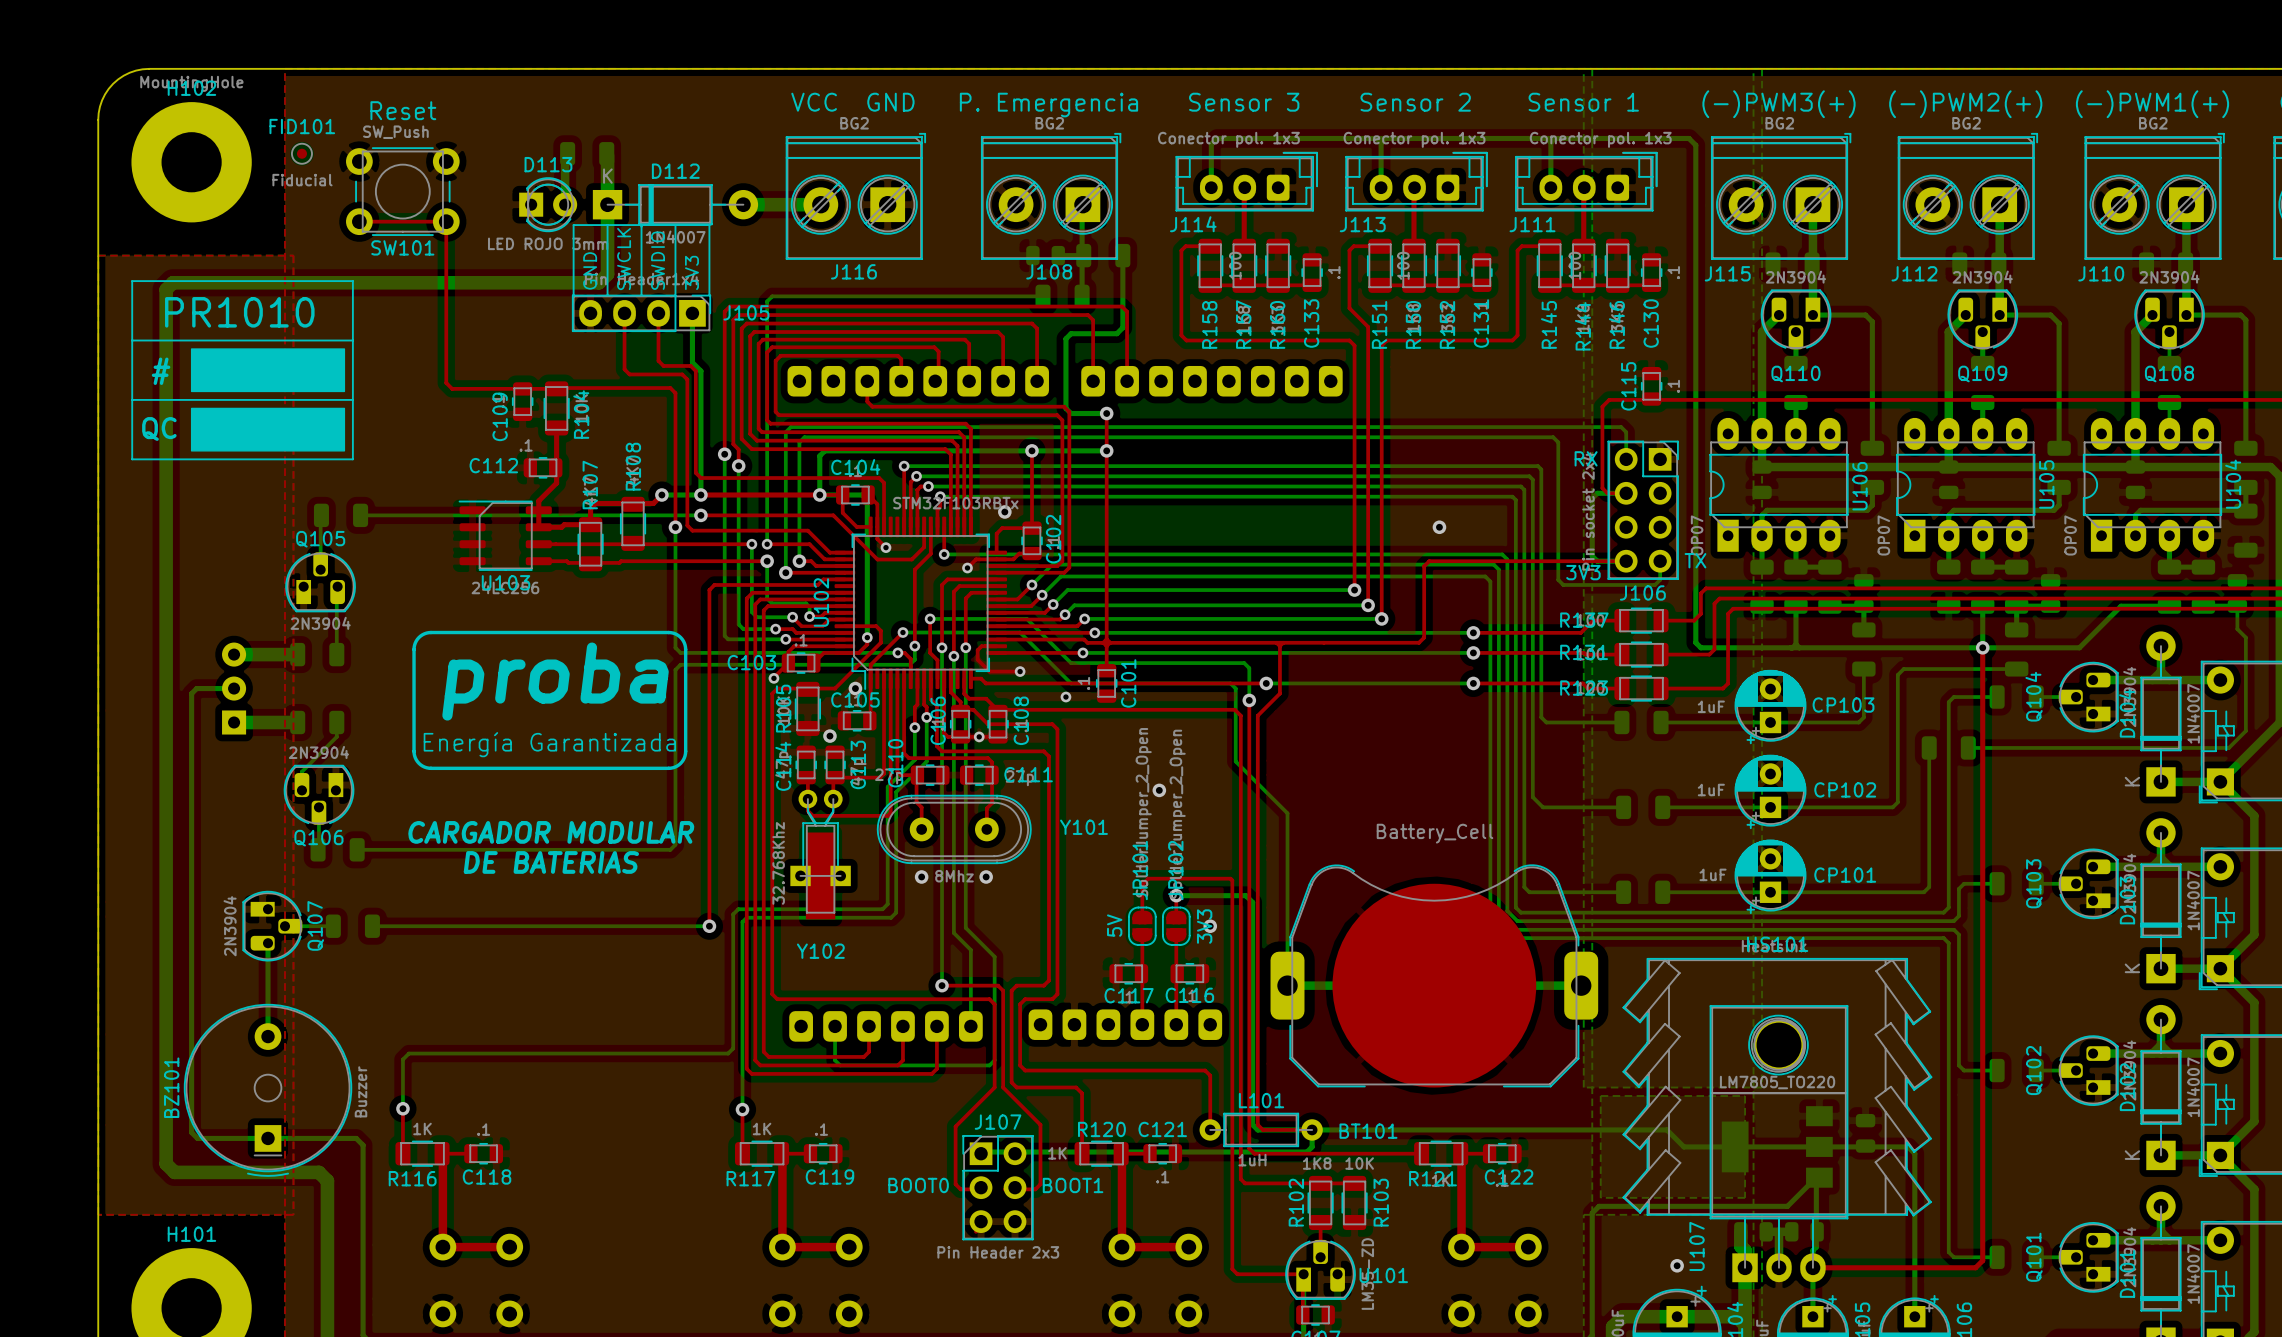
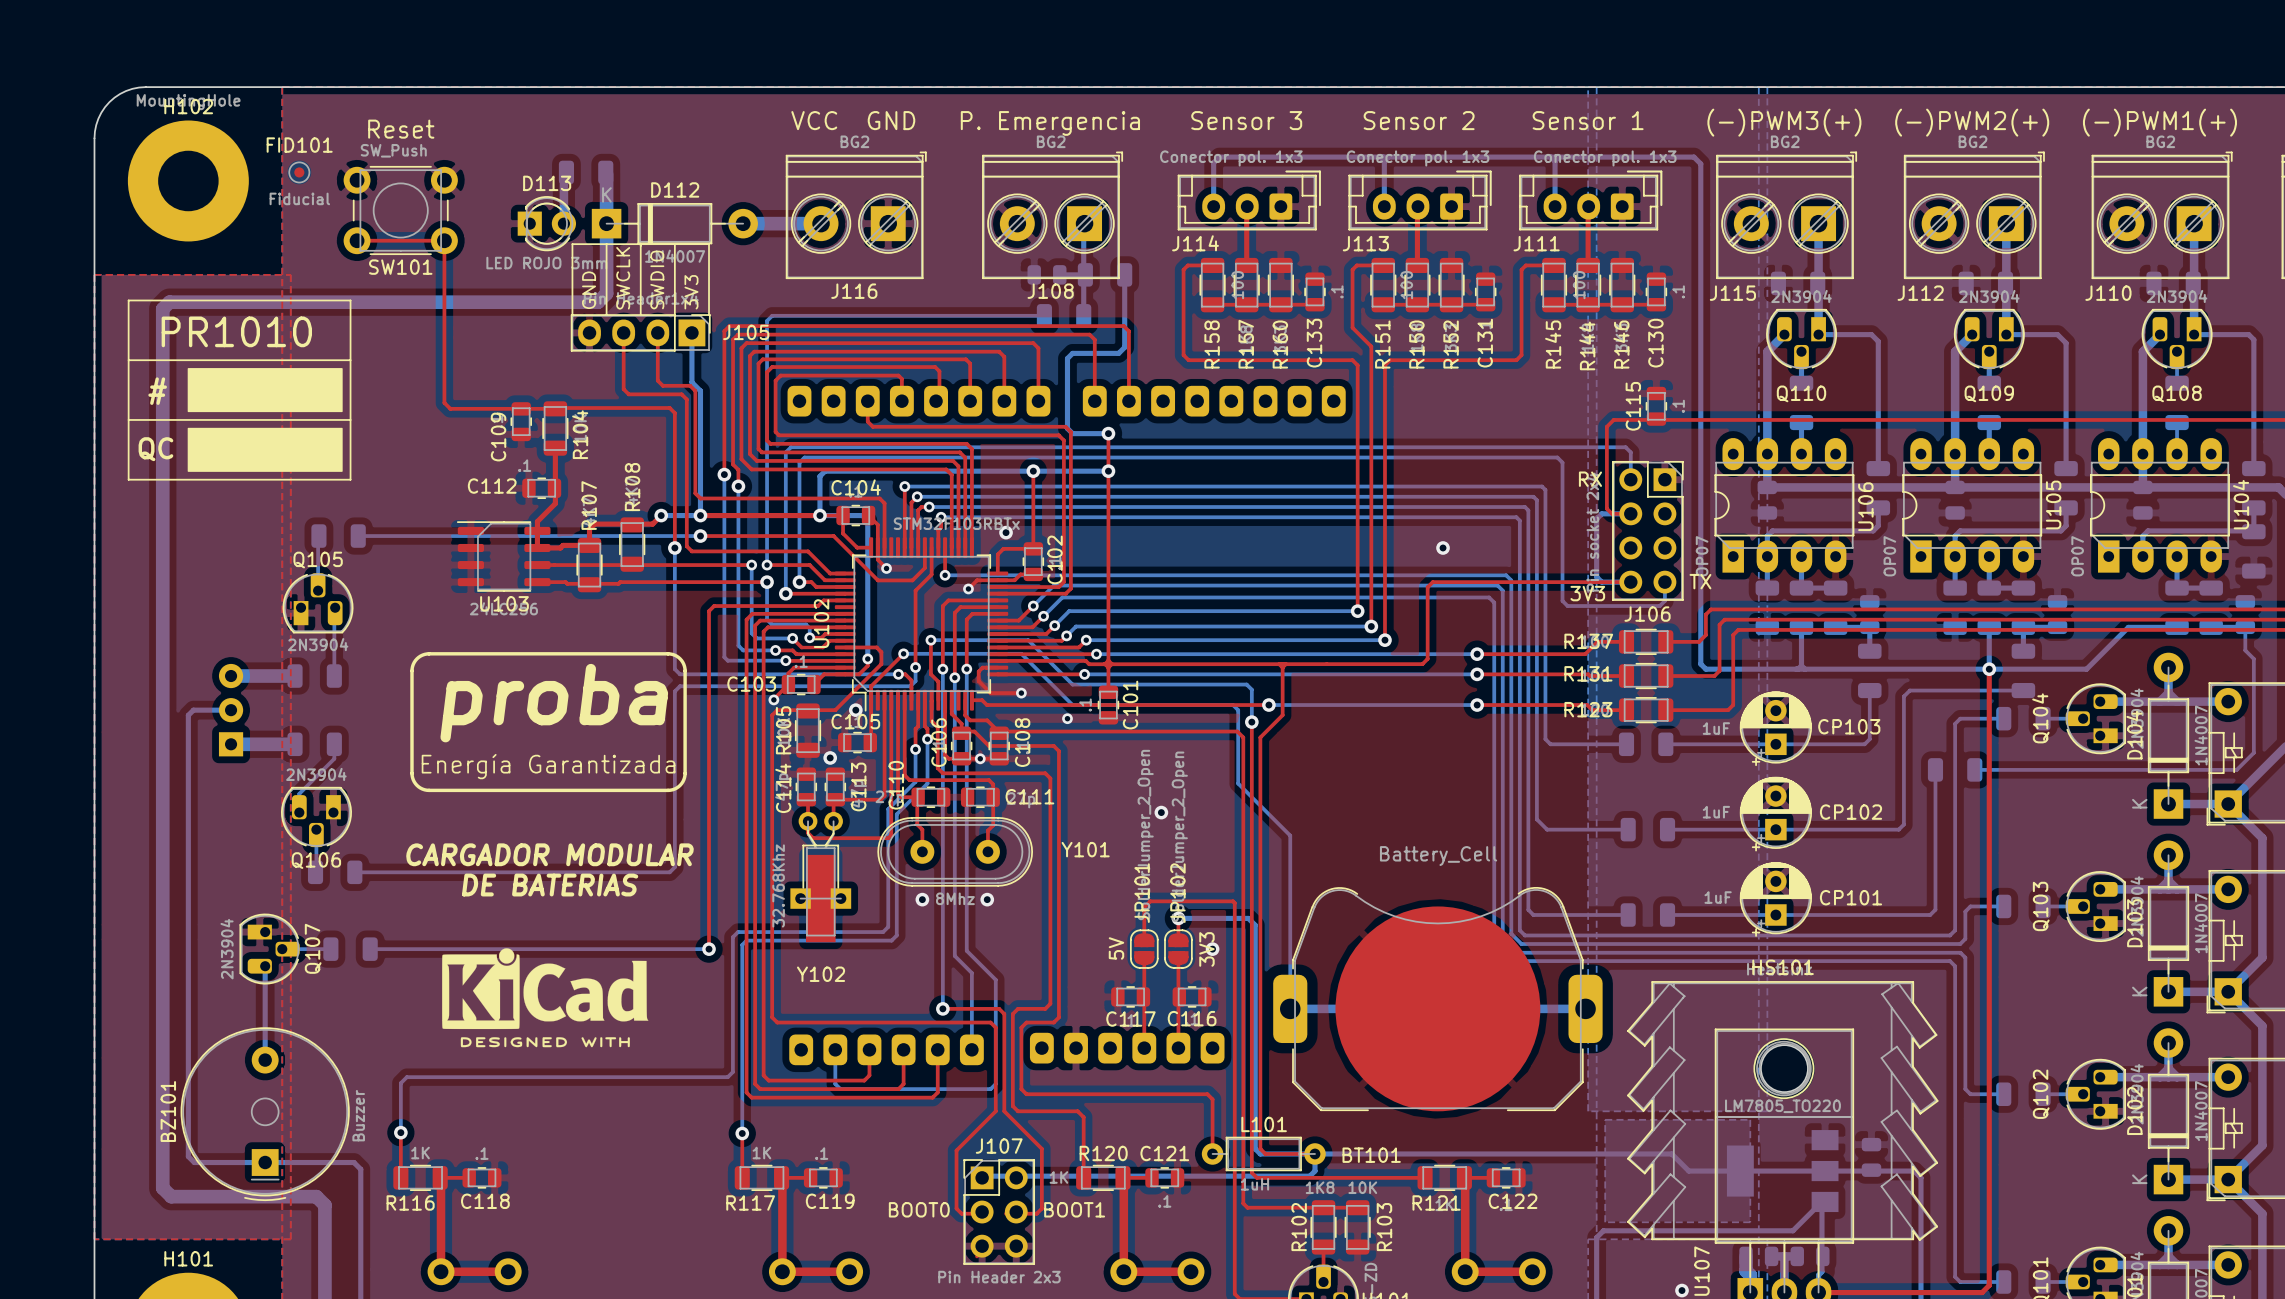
drawing: none -> [442, 948, 649, 1048]

